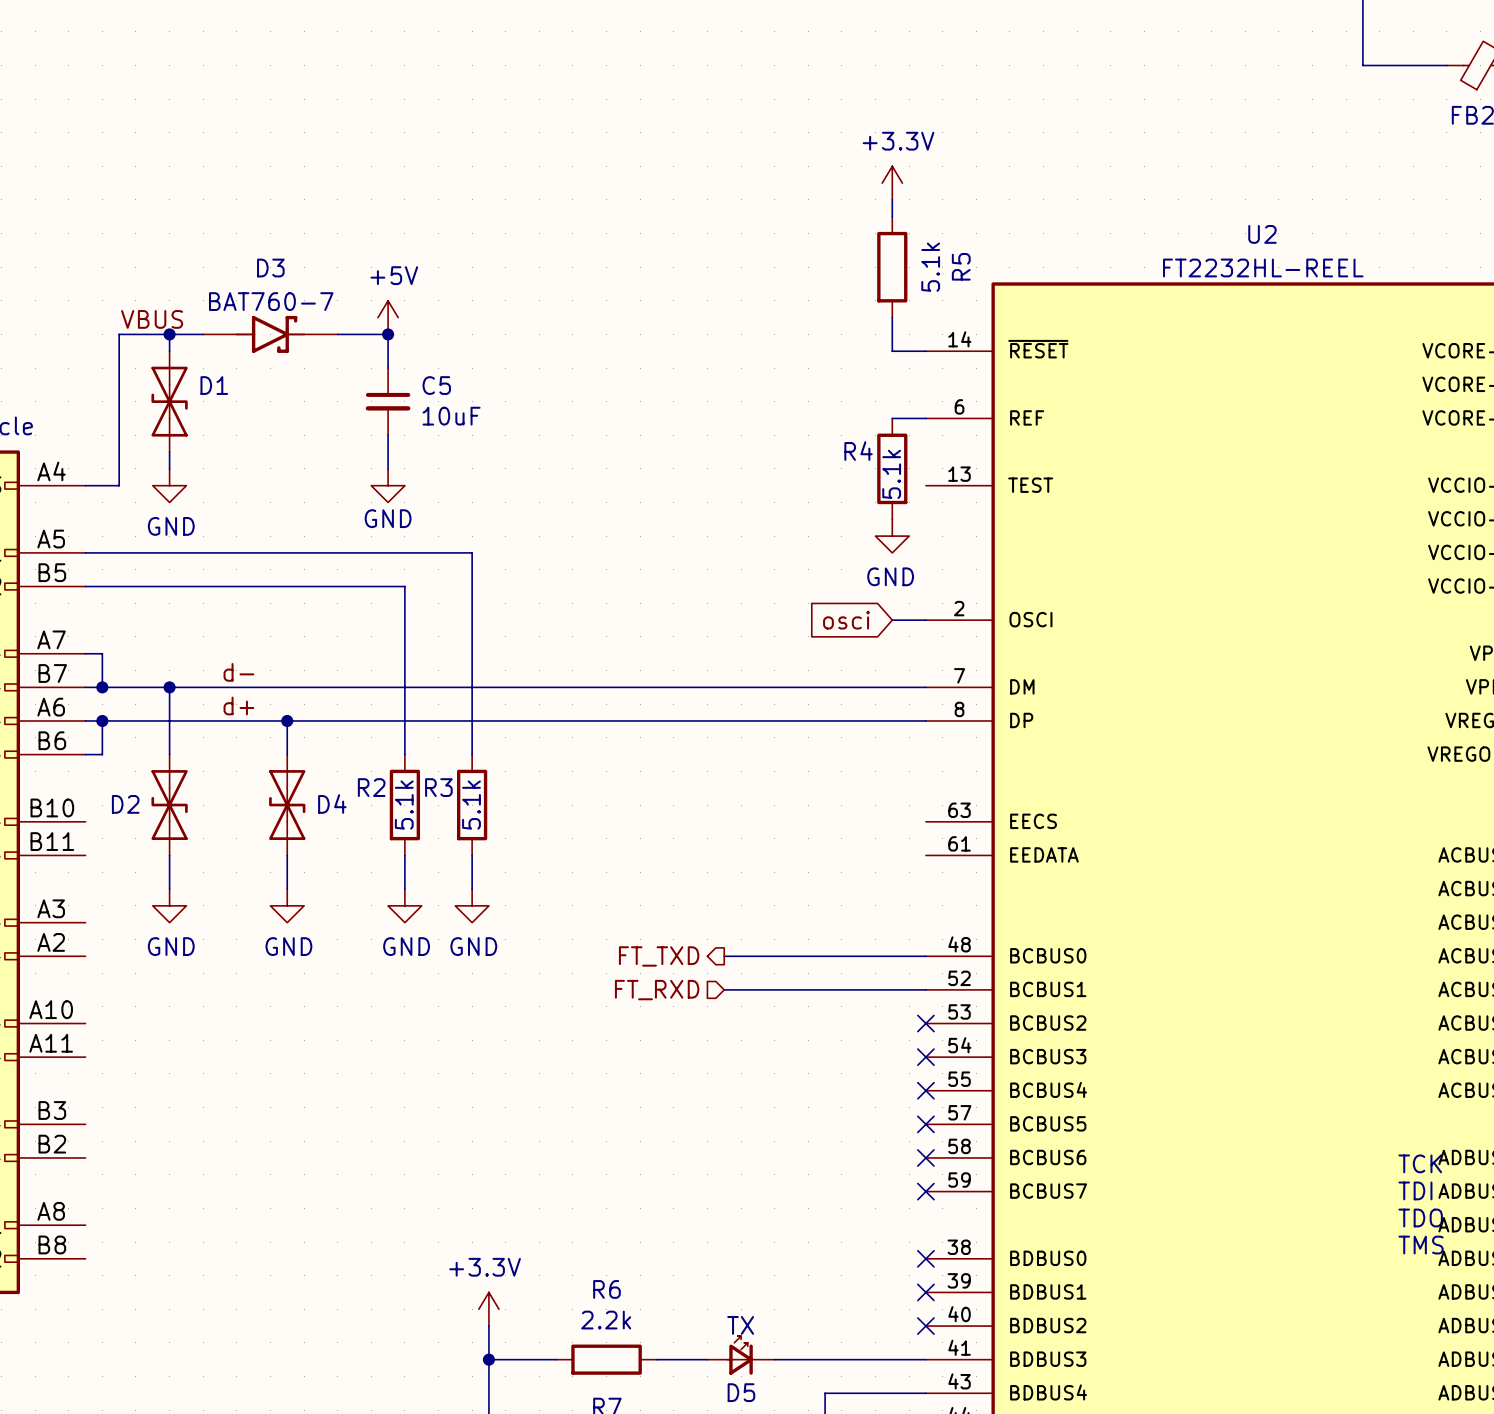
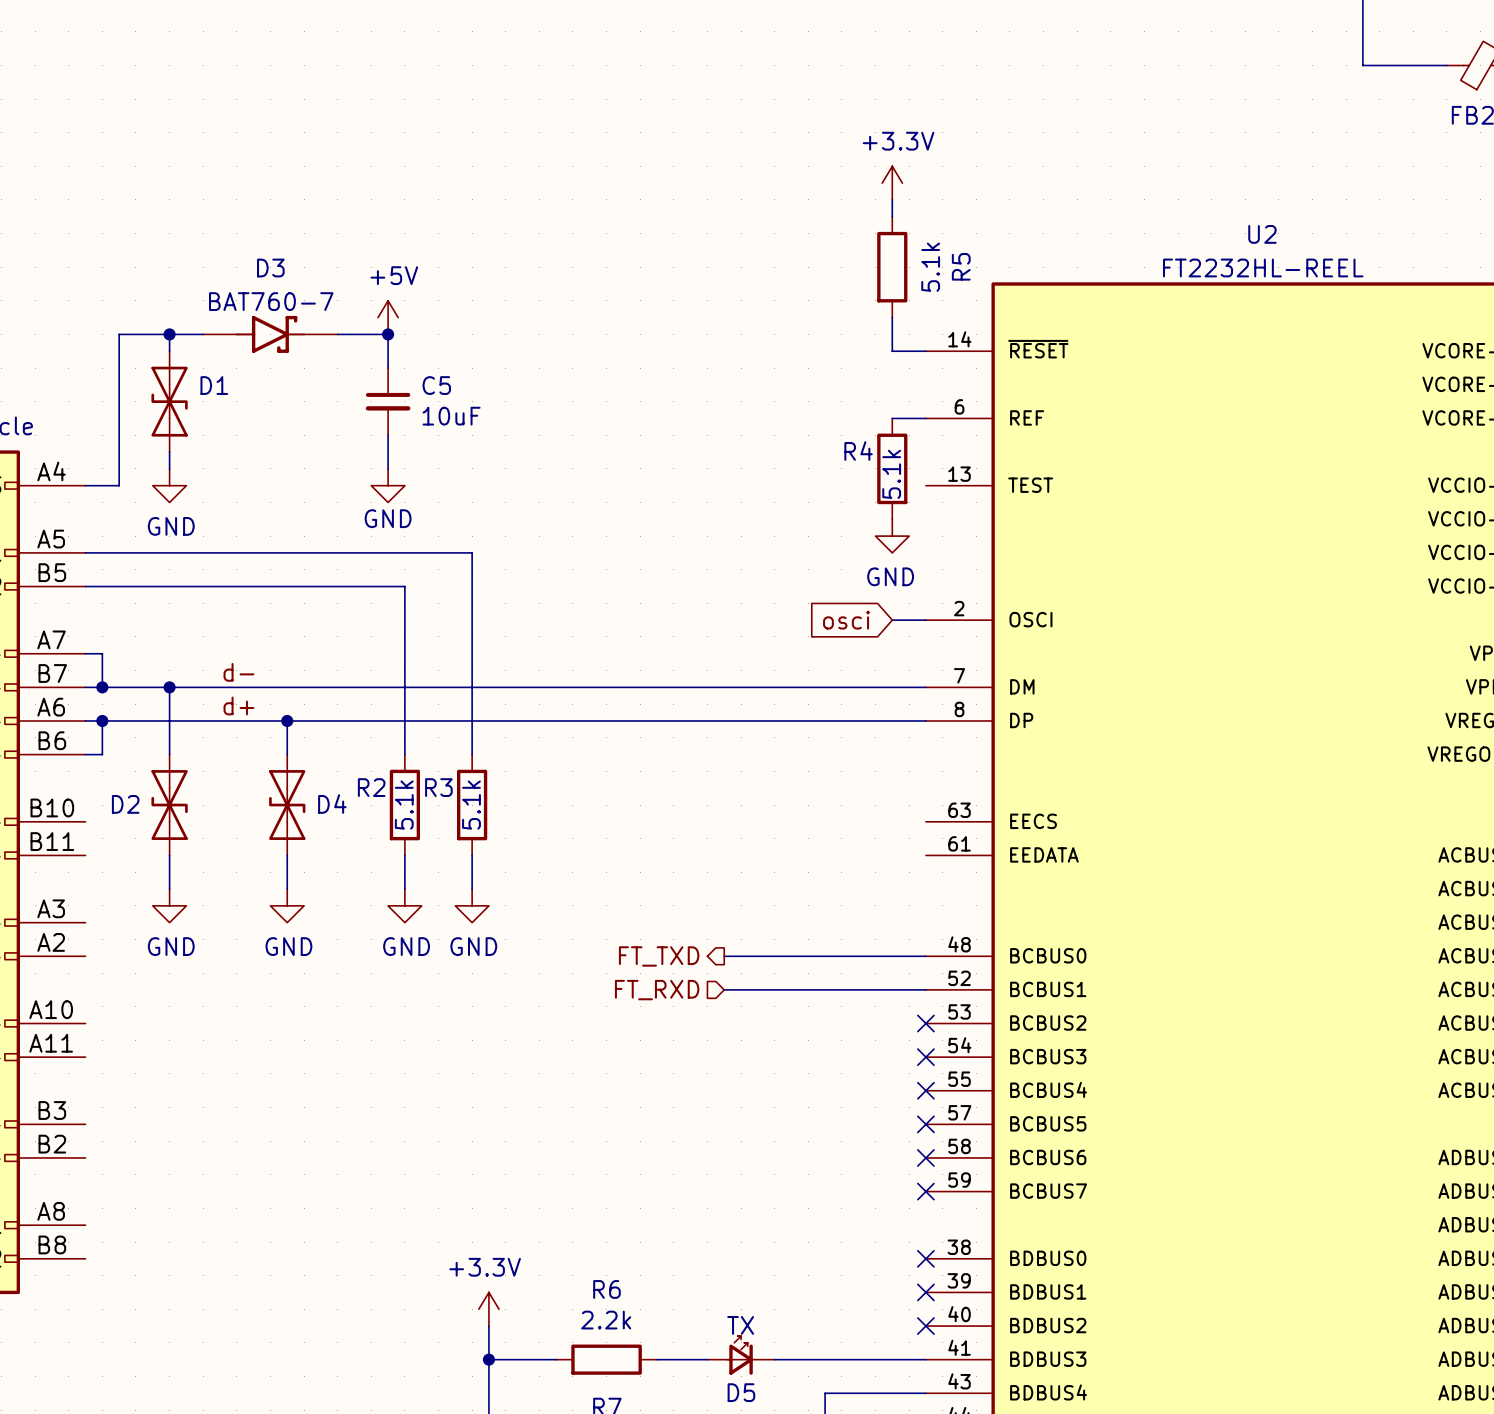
label: VBUS (152, 319) -> none
text: TCK (1420, 1163) -> none
text: TDI (1415, 1190) -> none
text: TDO (1420, 1217) -> none
text: TMS (1421, 1245) -> none

